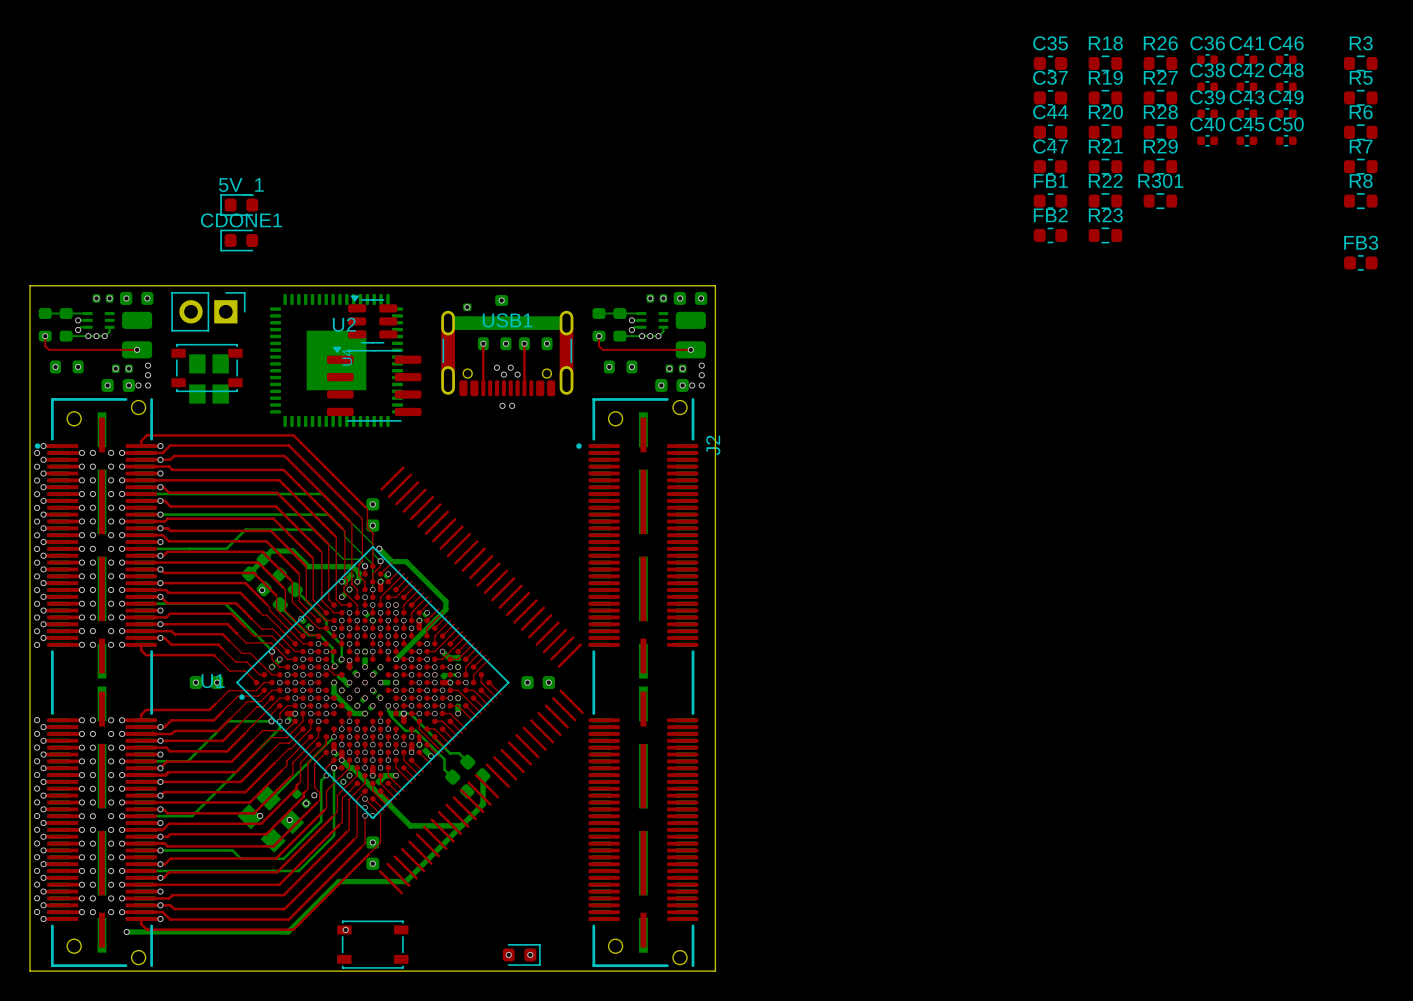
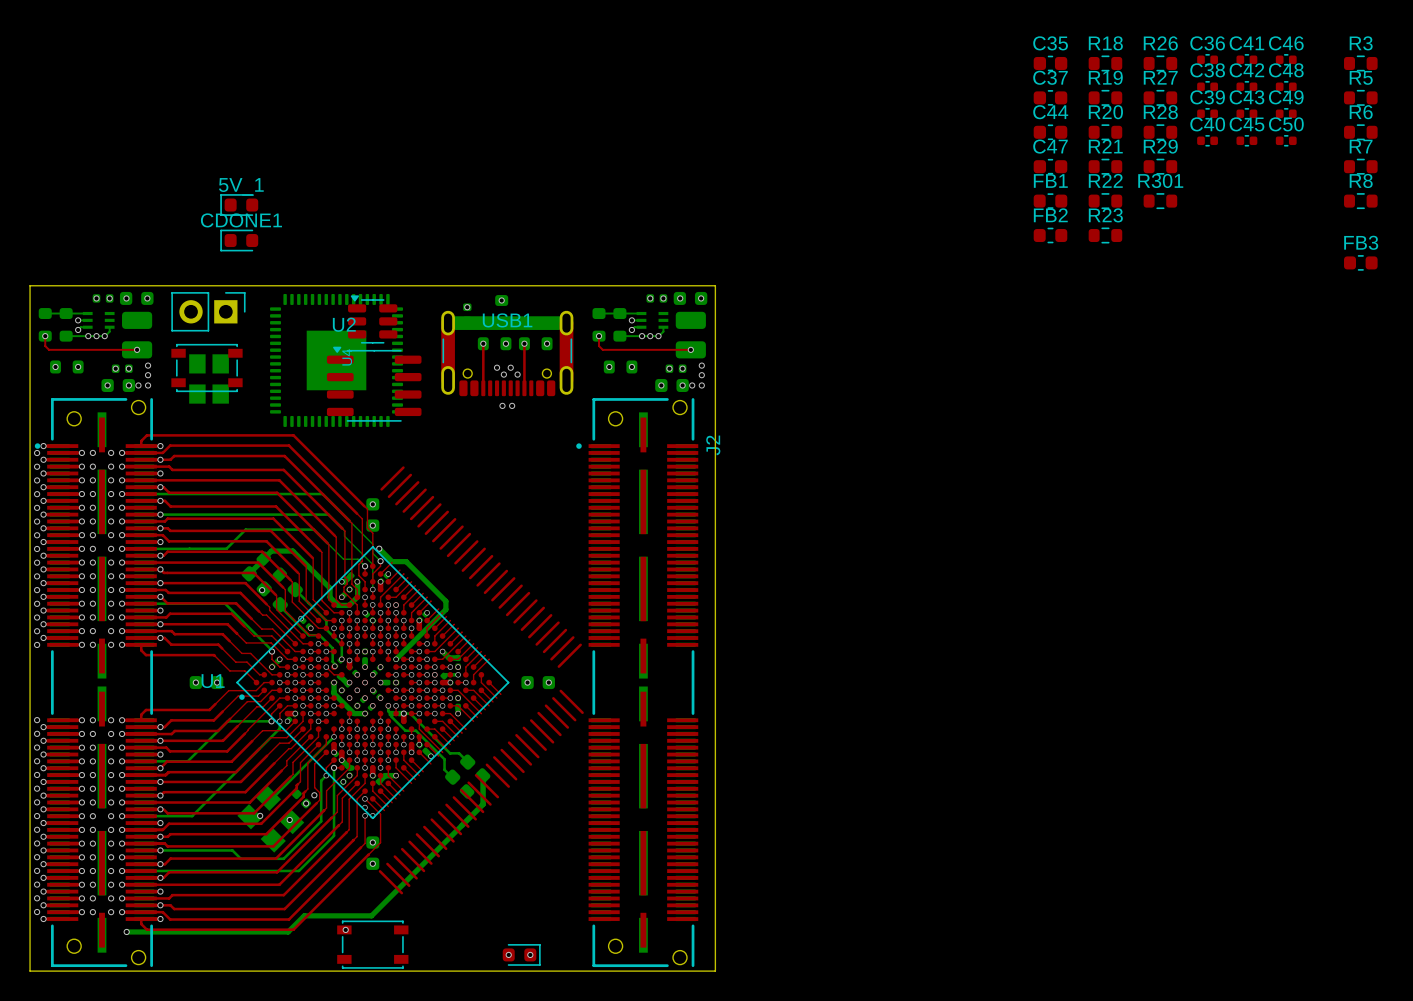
bottom track: (308, 566) (352, 566) (358, 572) (357, 581) -> (308, 566) (330, 588) (330, 597) (338, 605) (349, 605) (357, 596) (357, 581)
bottom track: (352, 768) (410, 825) (461, 825) -> none
bottom track: (405, 881) (338, 881) (304, 915) -> (405, 881) (371, 915) (304, 915)

